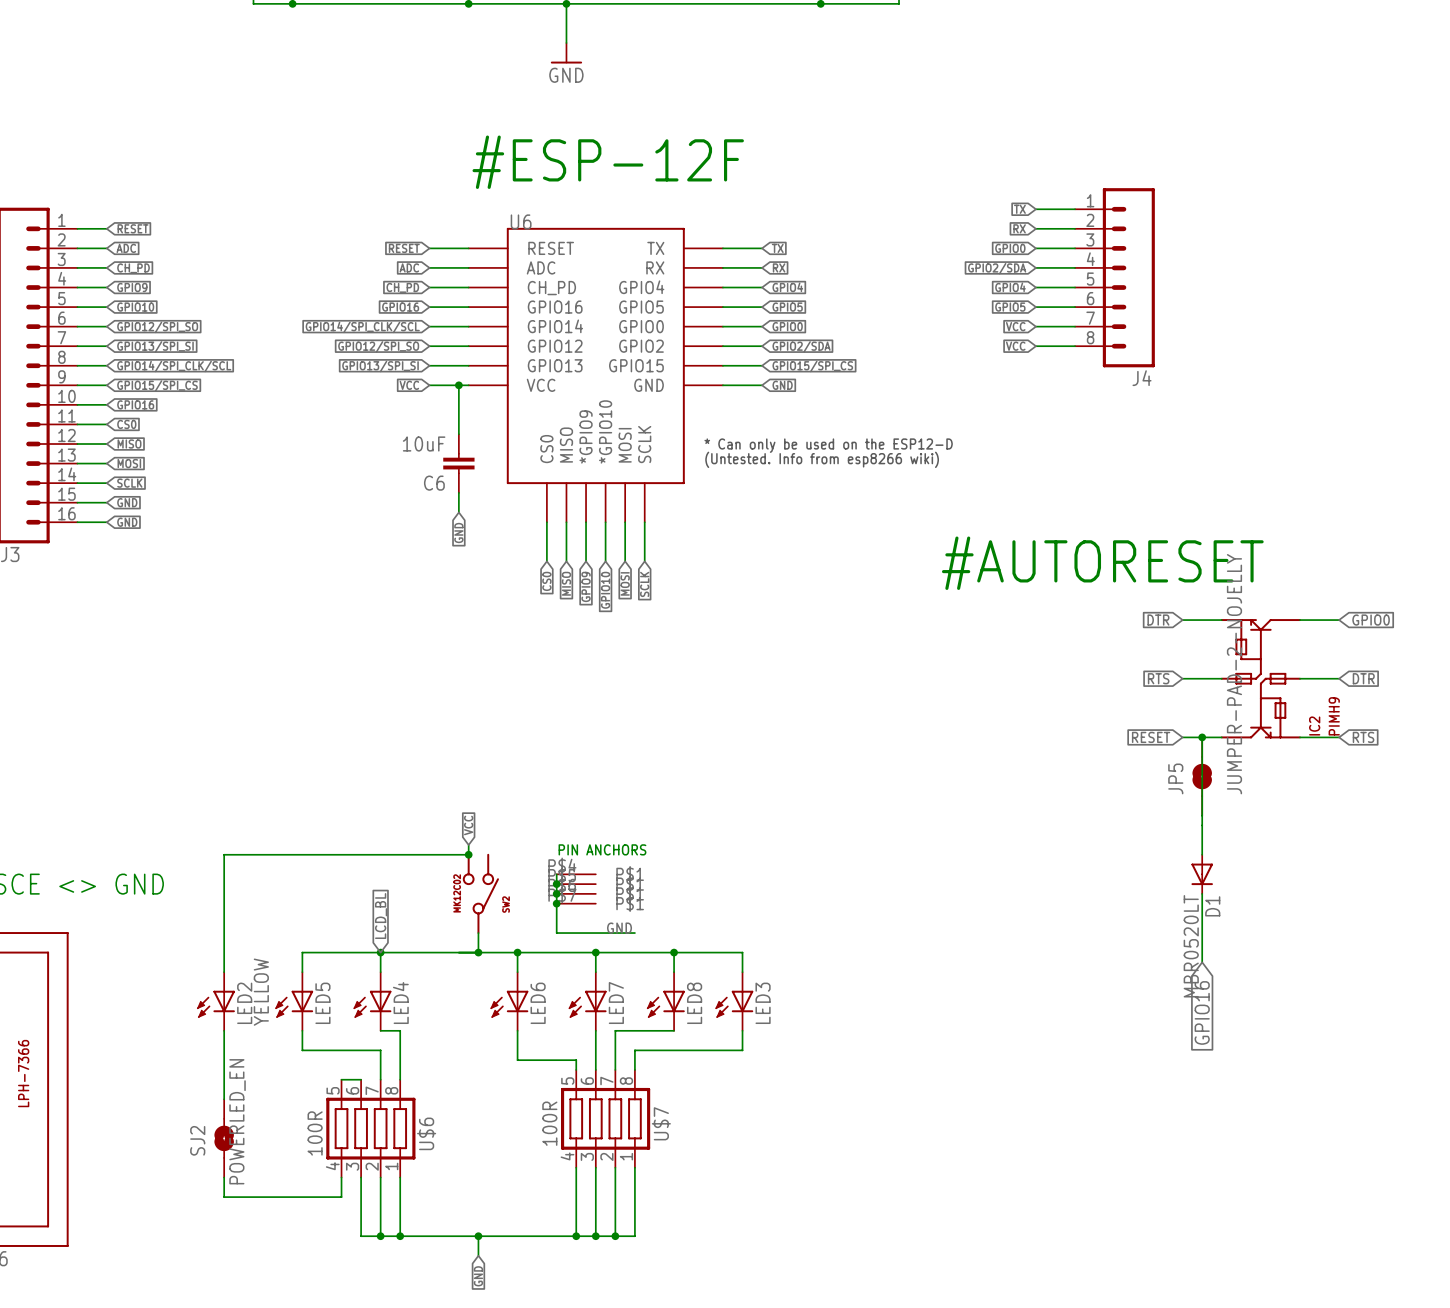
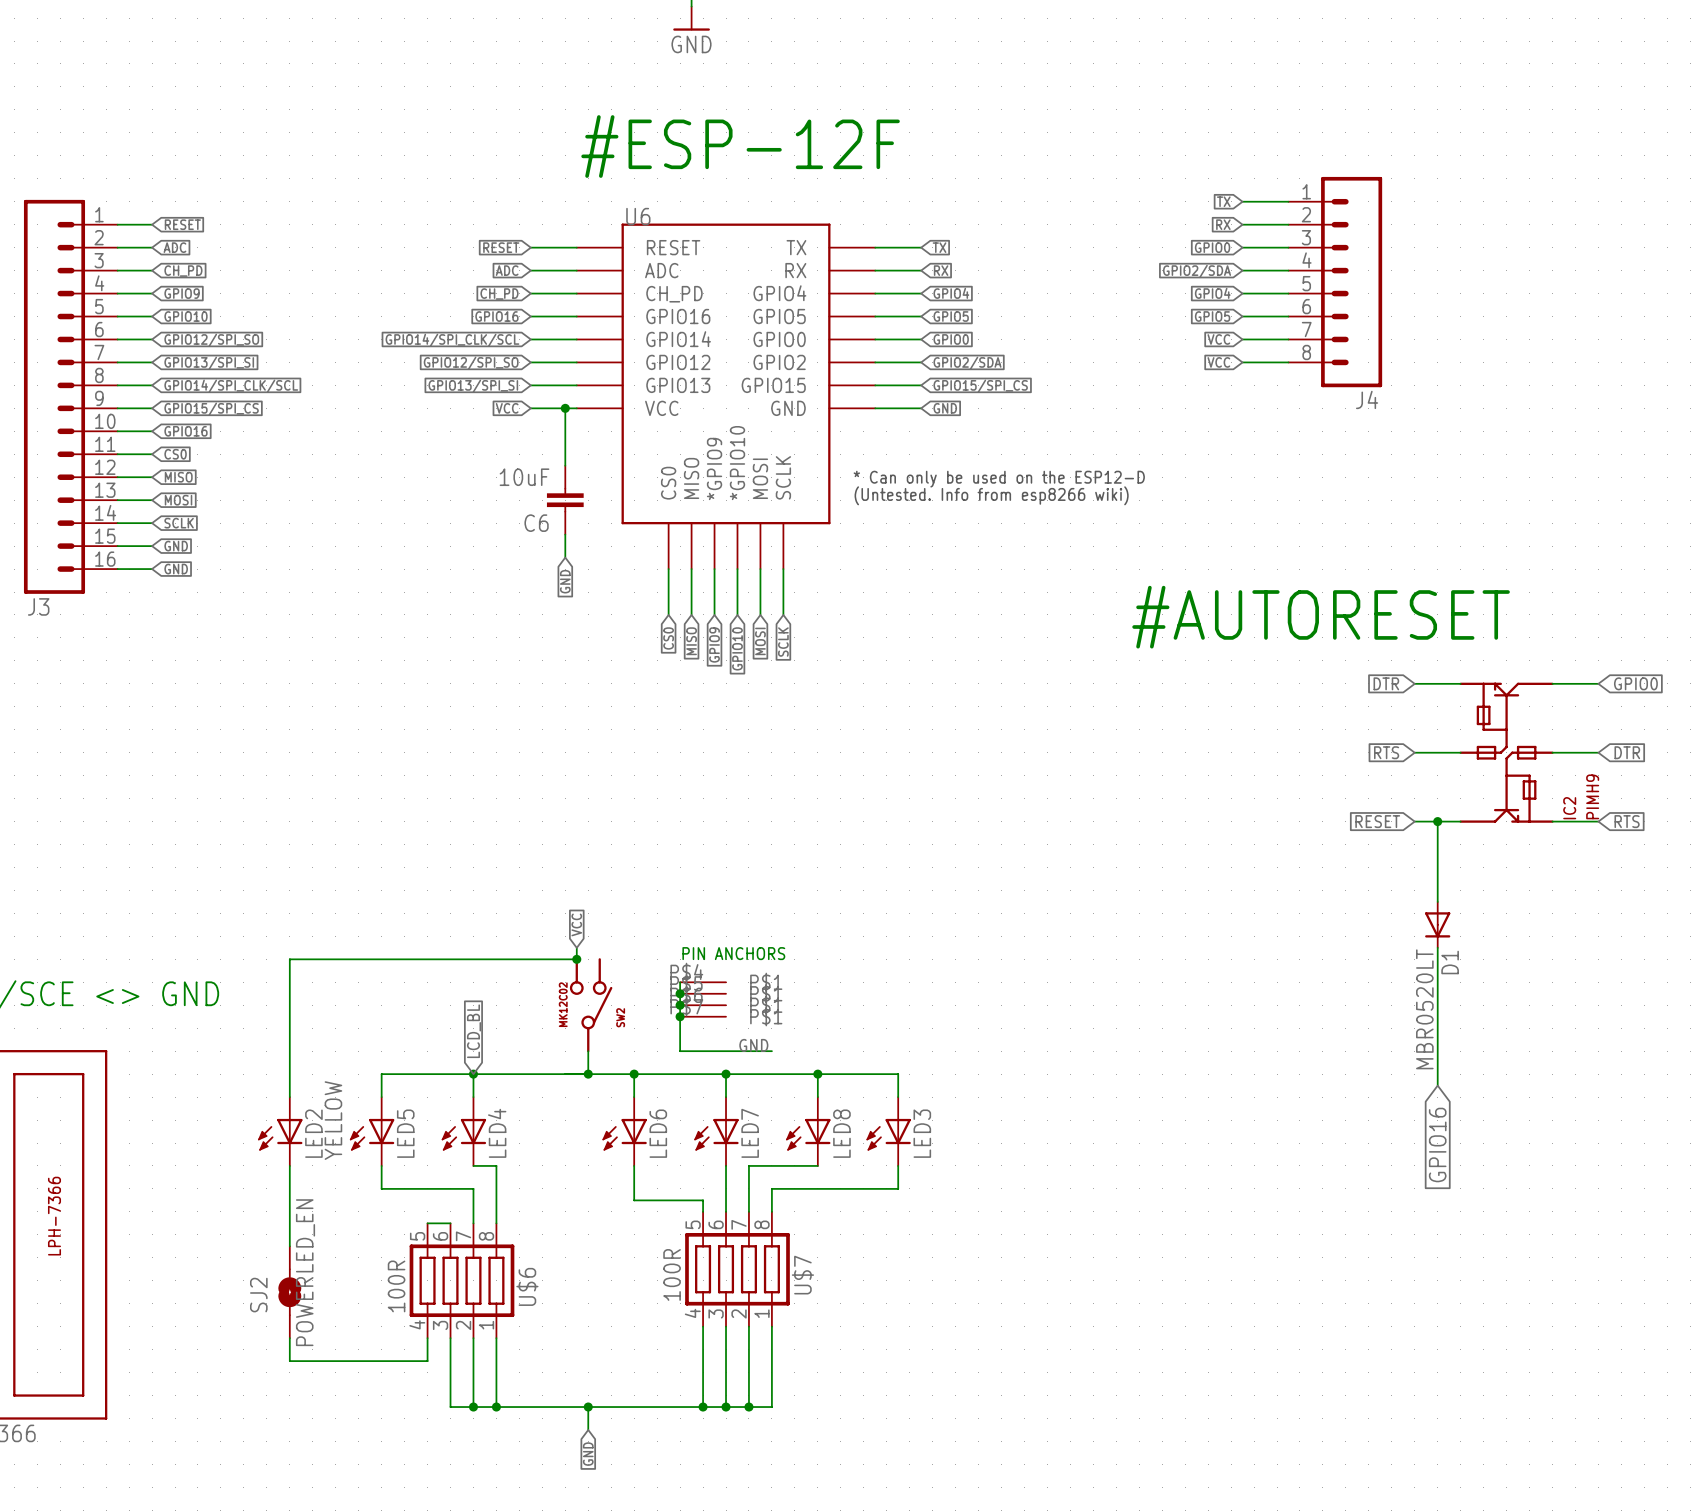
JP5: JUMPER-PAD-2-NOJELLY (1202, 776) -> none
D1 position: (1202, 874) -> (1437, 924)

